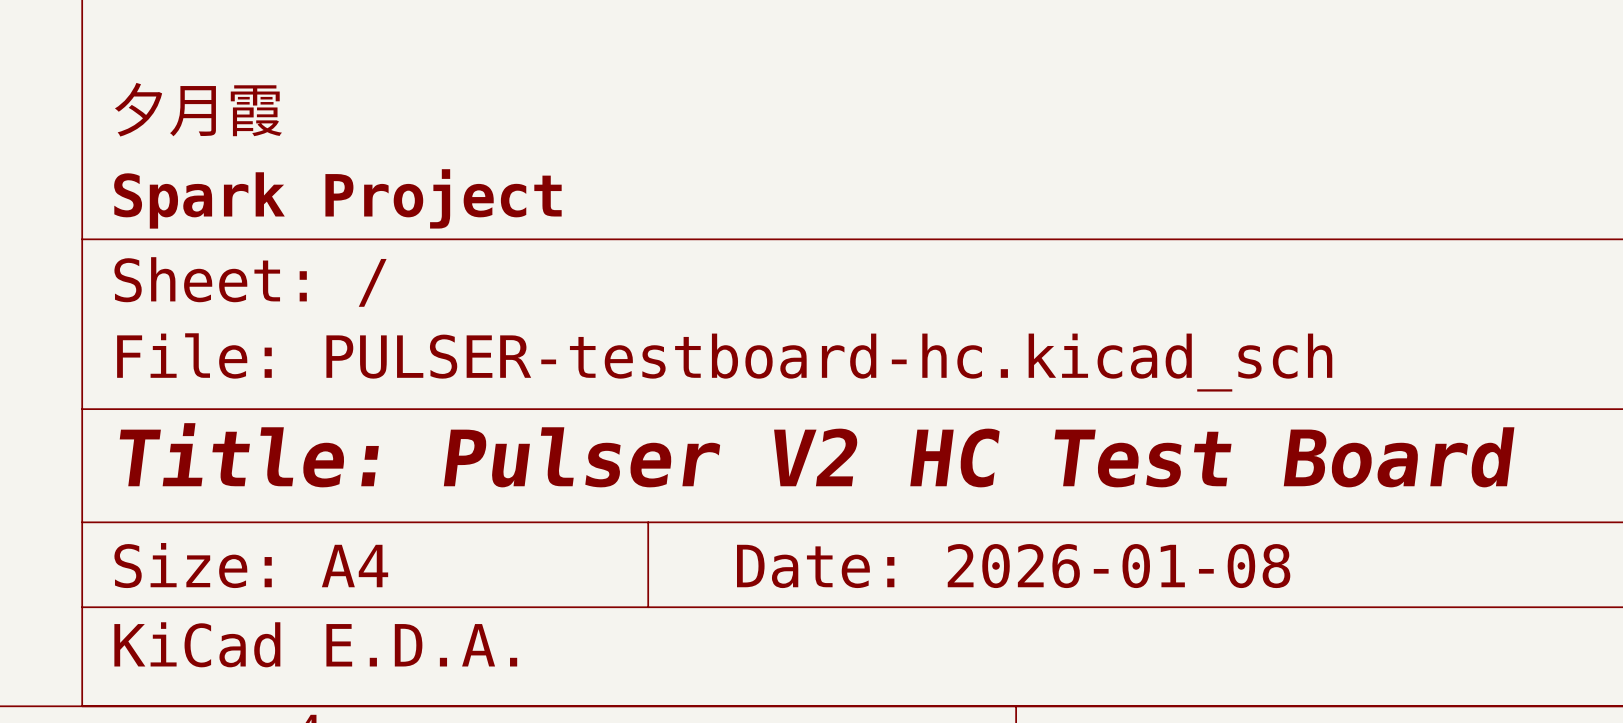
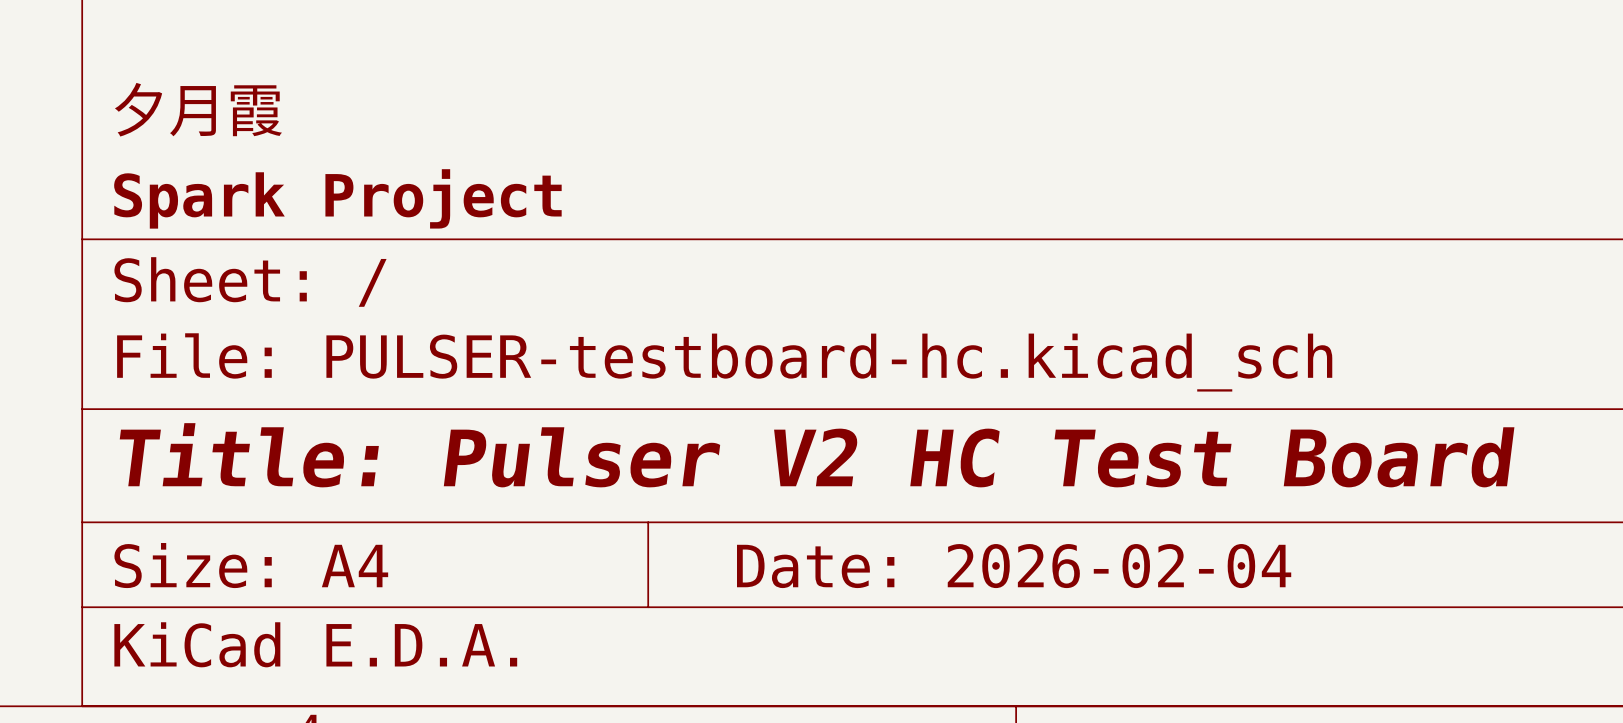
title block: Date: 2026-01-08 (1013, 566) -> Date: 2026-02-04 (1014, 566)

